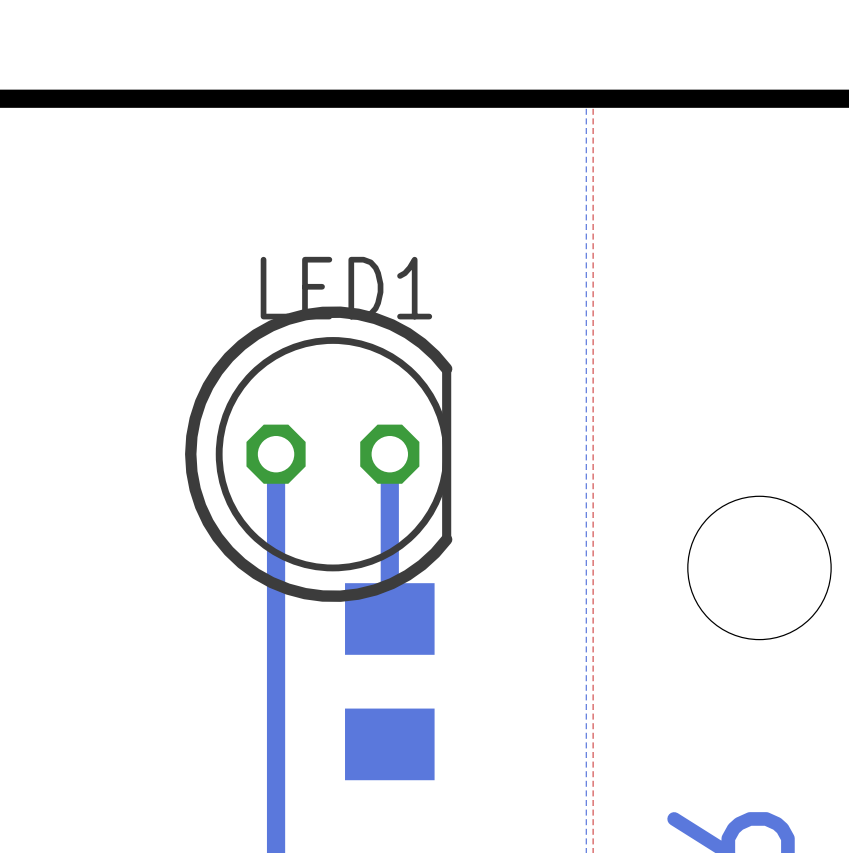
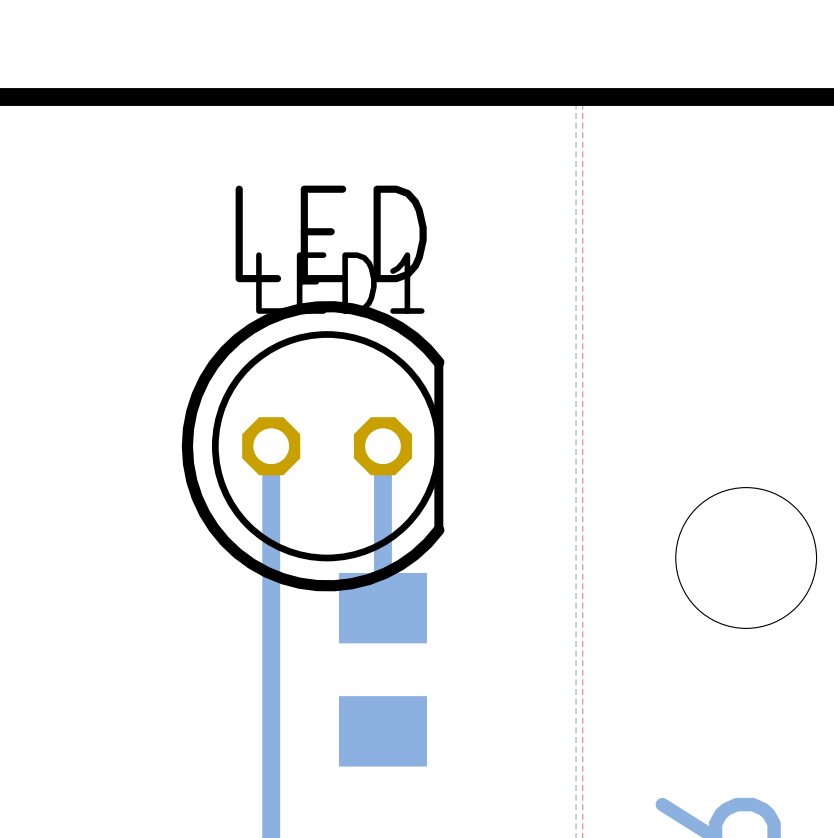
text: none -> LED (331, 233)

